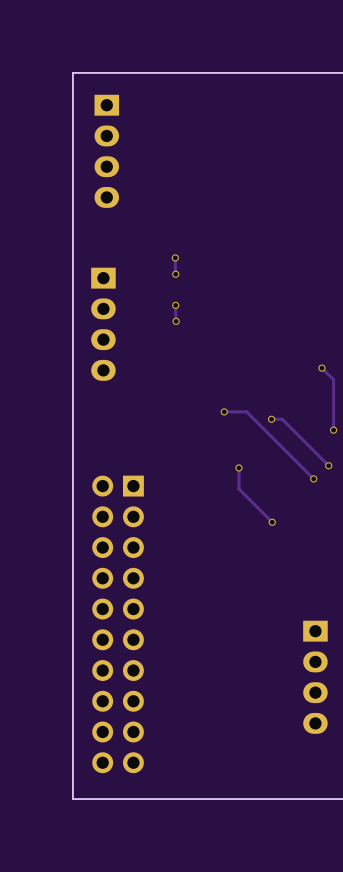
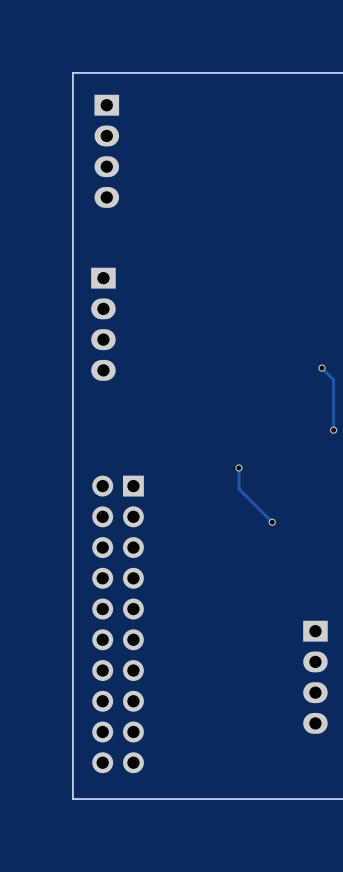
track: (175, 257) (175, 274) -> none
via: (175, 257) -> none
via: (175, 274) -> none
track: (175, 305) (176, 321) -> none
via: (175, 305) -> none
via: (176, 321) -> none
track: (224, 411) (246, 411) (313, 478) -> none
via: (224, 411) -> none
track: (271, 419) (282, 419) (328, 465) -> none
via: (271, 419) -> none
via: (328, 465) -> none
via: (313, 478) -> none

